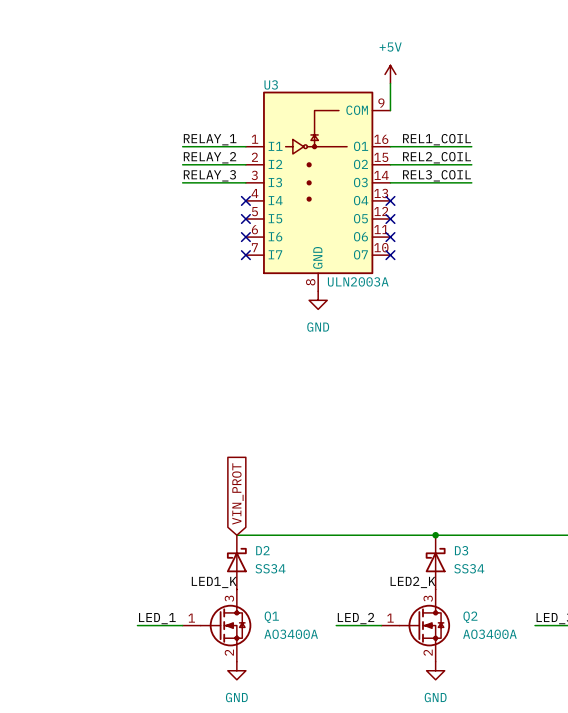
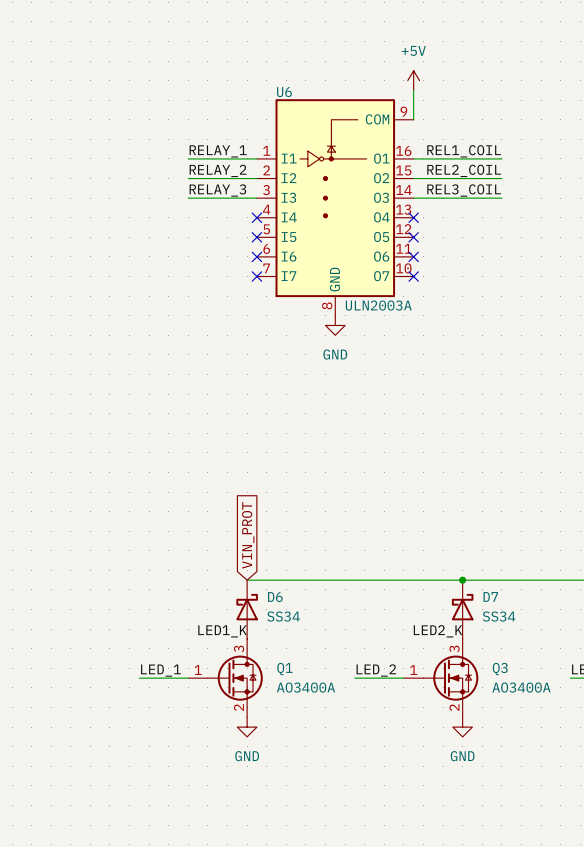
U3 name: U3 (271, 84) -> U6 (284, 92)
D2 name: D2 (262, 550) -> D6 (275, 597)
D3 name: D3 (461, 550) -> D7 (490, 596)
Q2 name: Q2 (470, 617) -> Q3 (500, 669)

